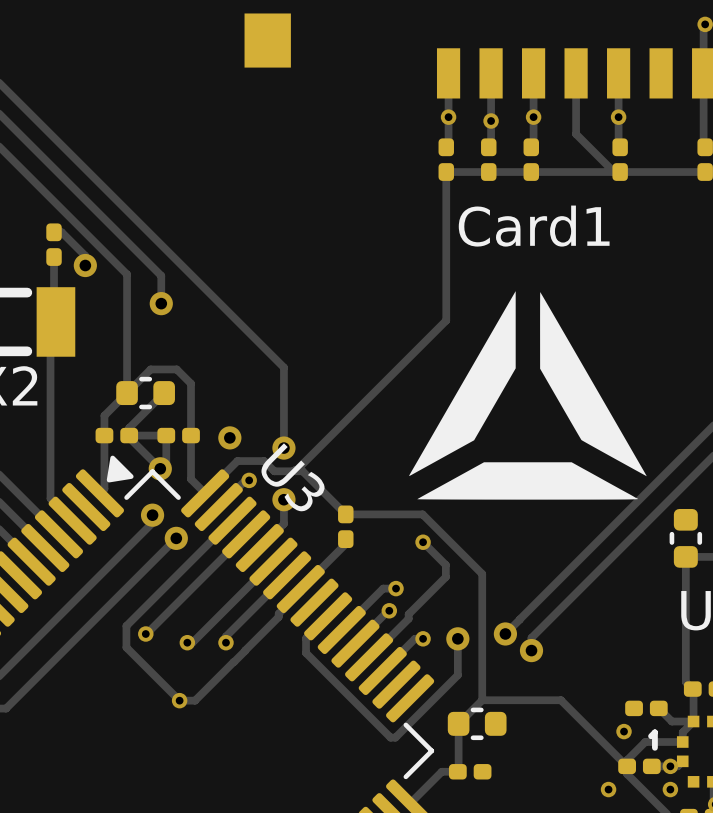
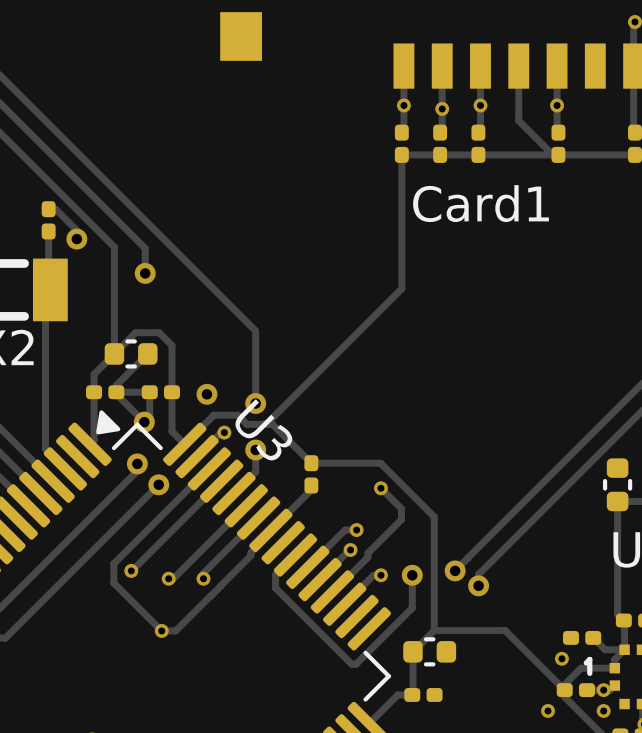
drawing: [409, 291, 647, 500] -> none

